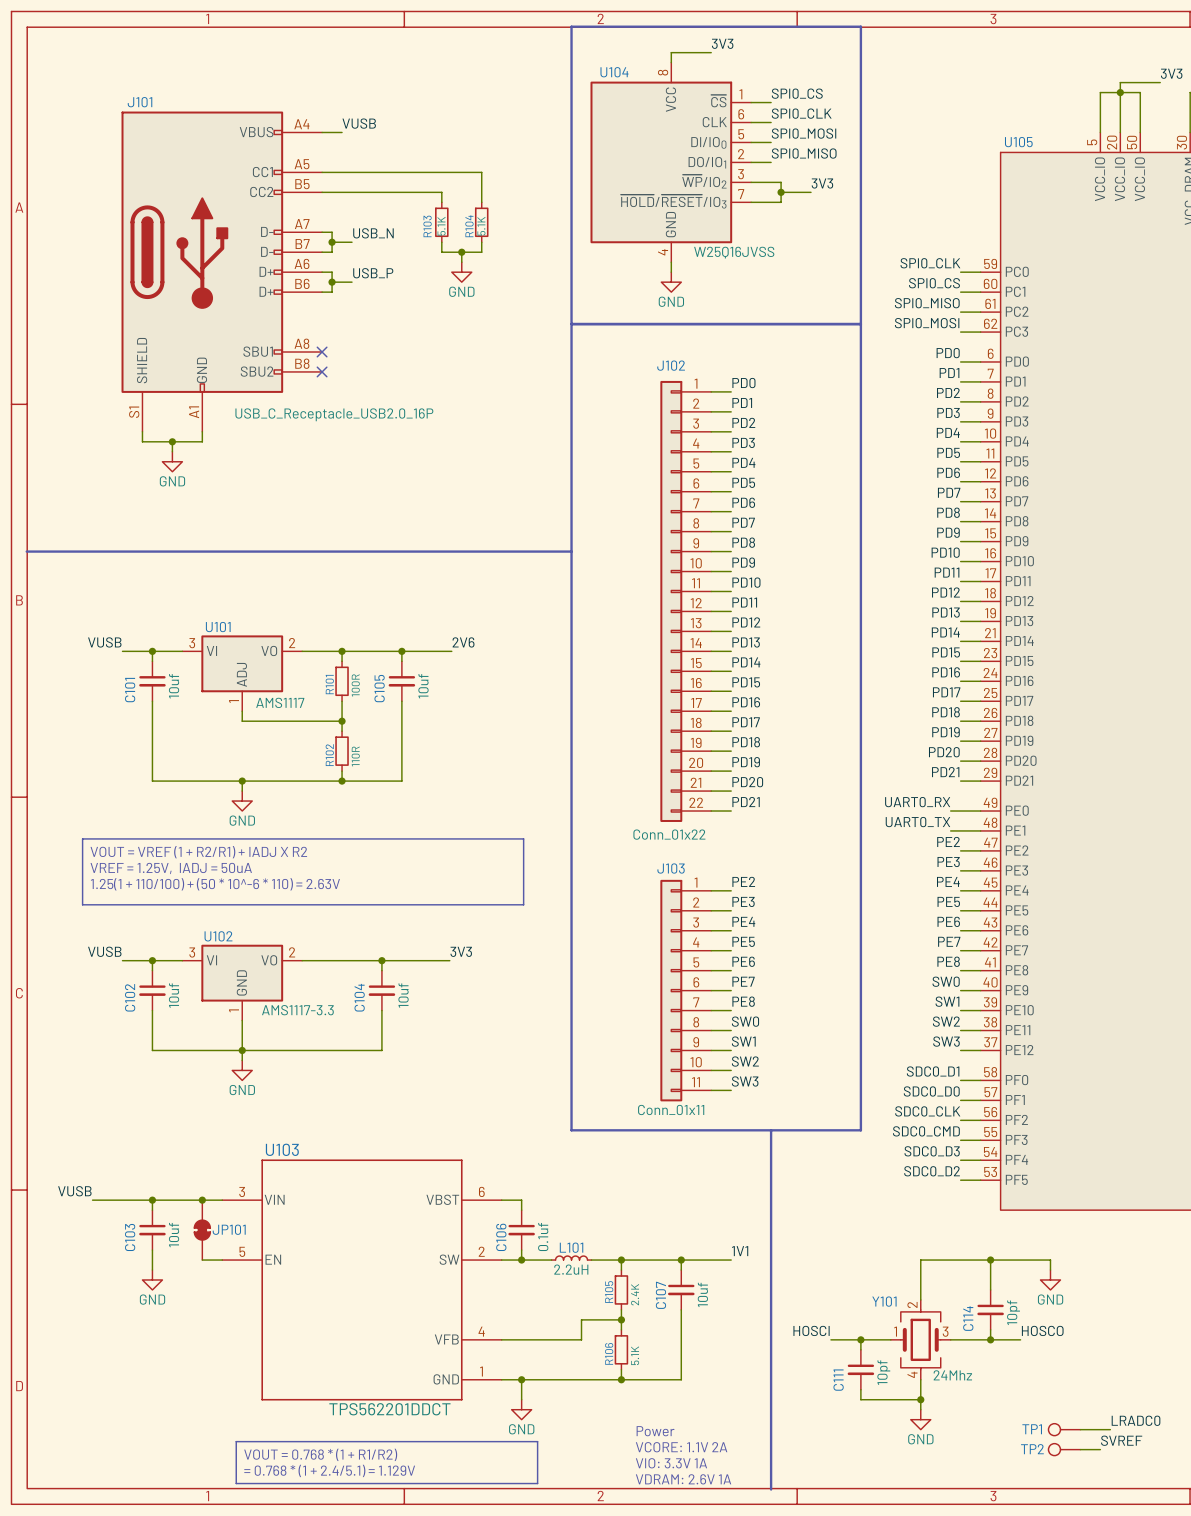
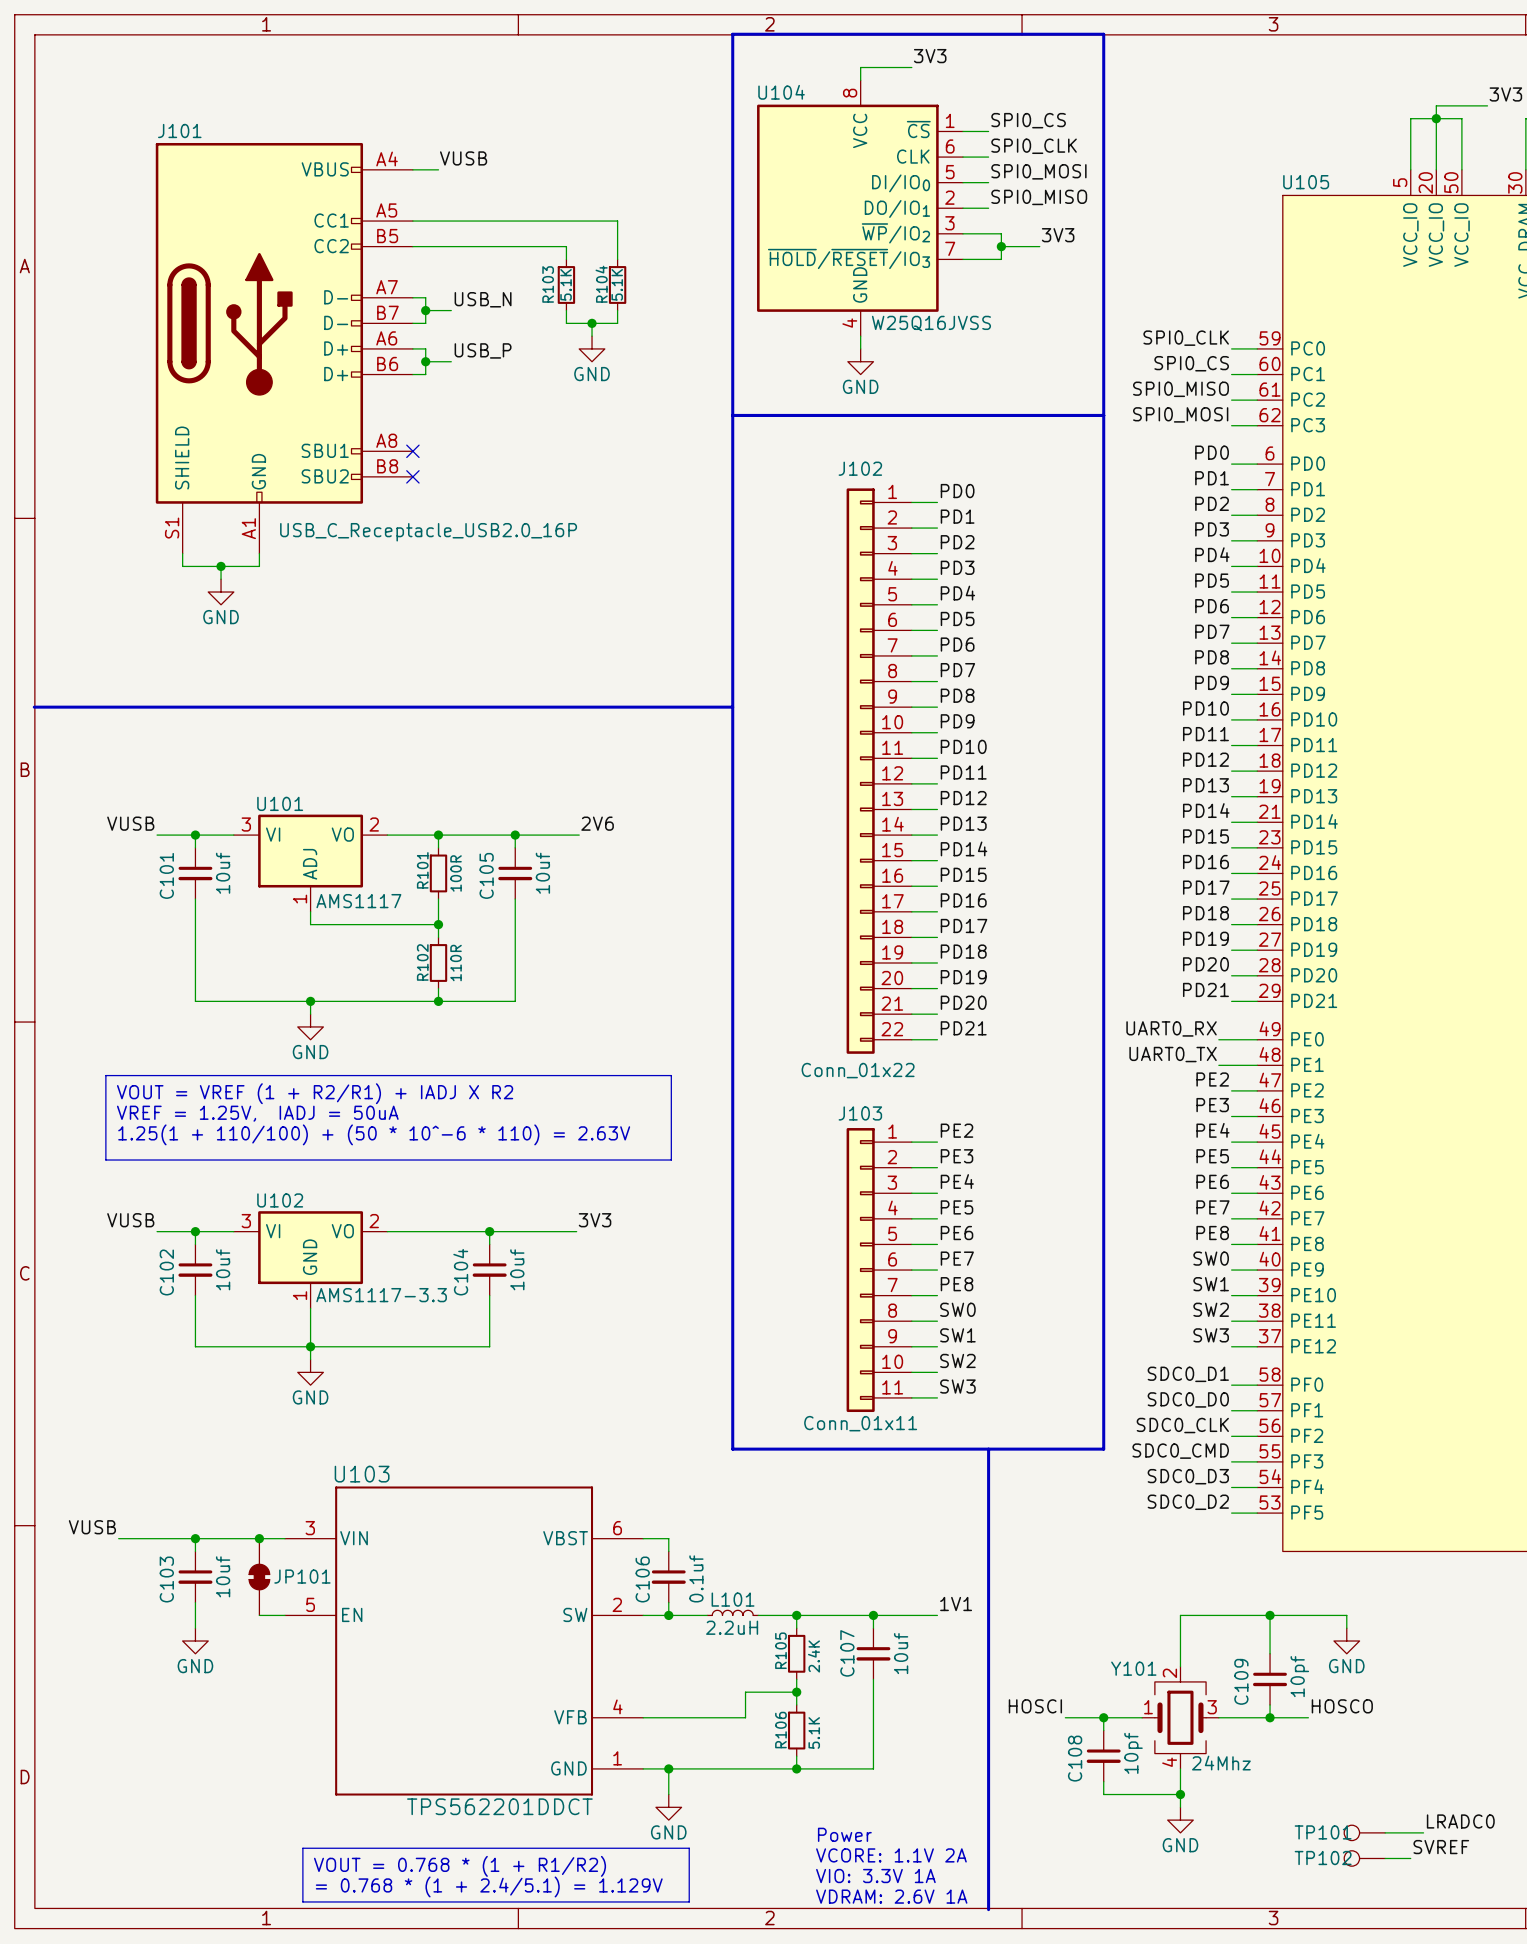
C114 name: C114 (968, 1318) -> C109 (1241, 1681)
C111 name: C111 (838, 1380) -> C108 (1075, 1758)
TP1 name: TP1 (1032, 1429) -> TP101 (1323, 1832)
TP2 name: TP2 (1032, 1449) -> TP102 (1323, 1858)

